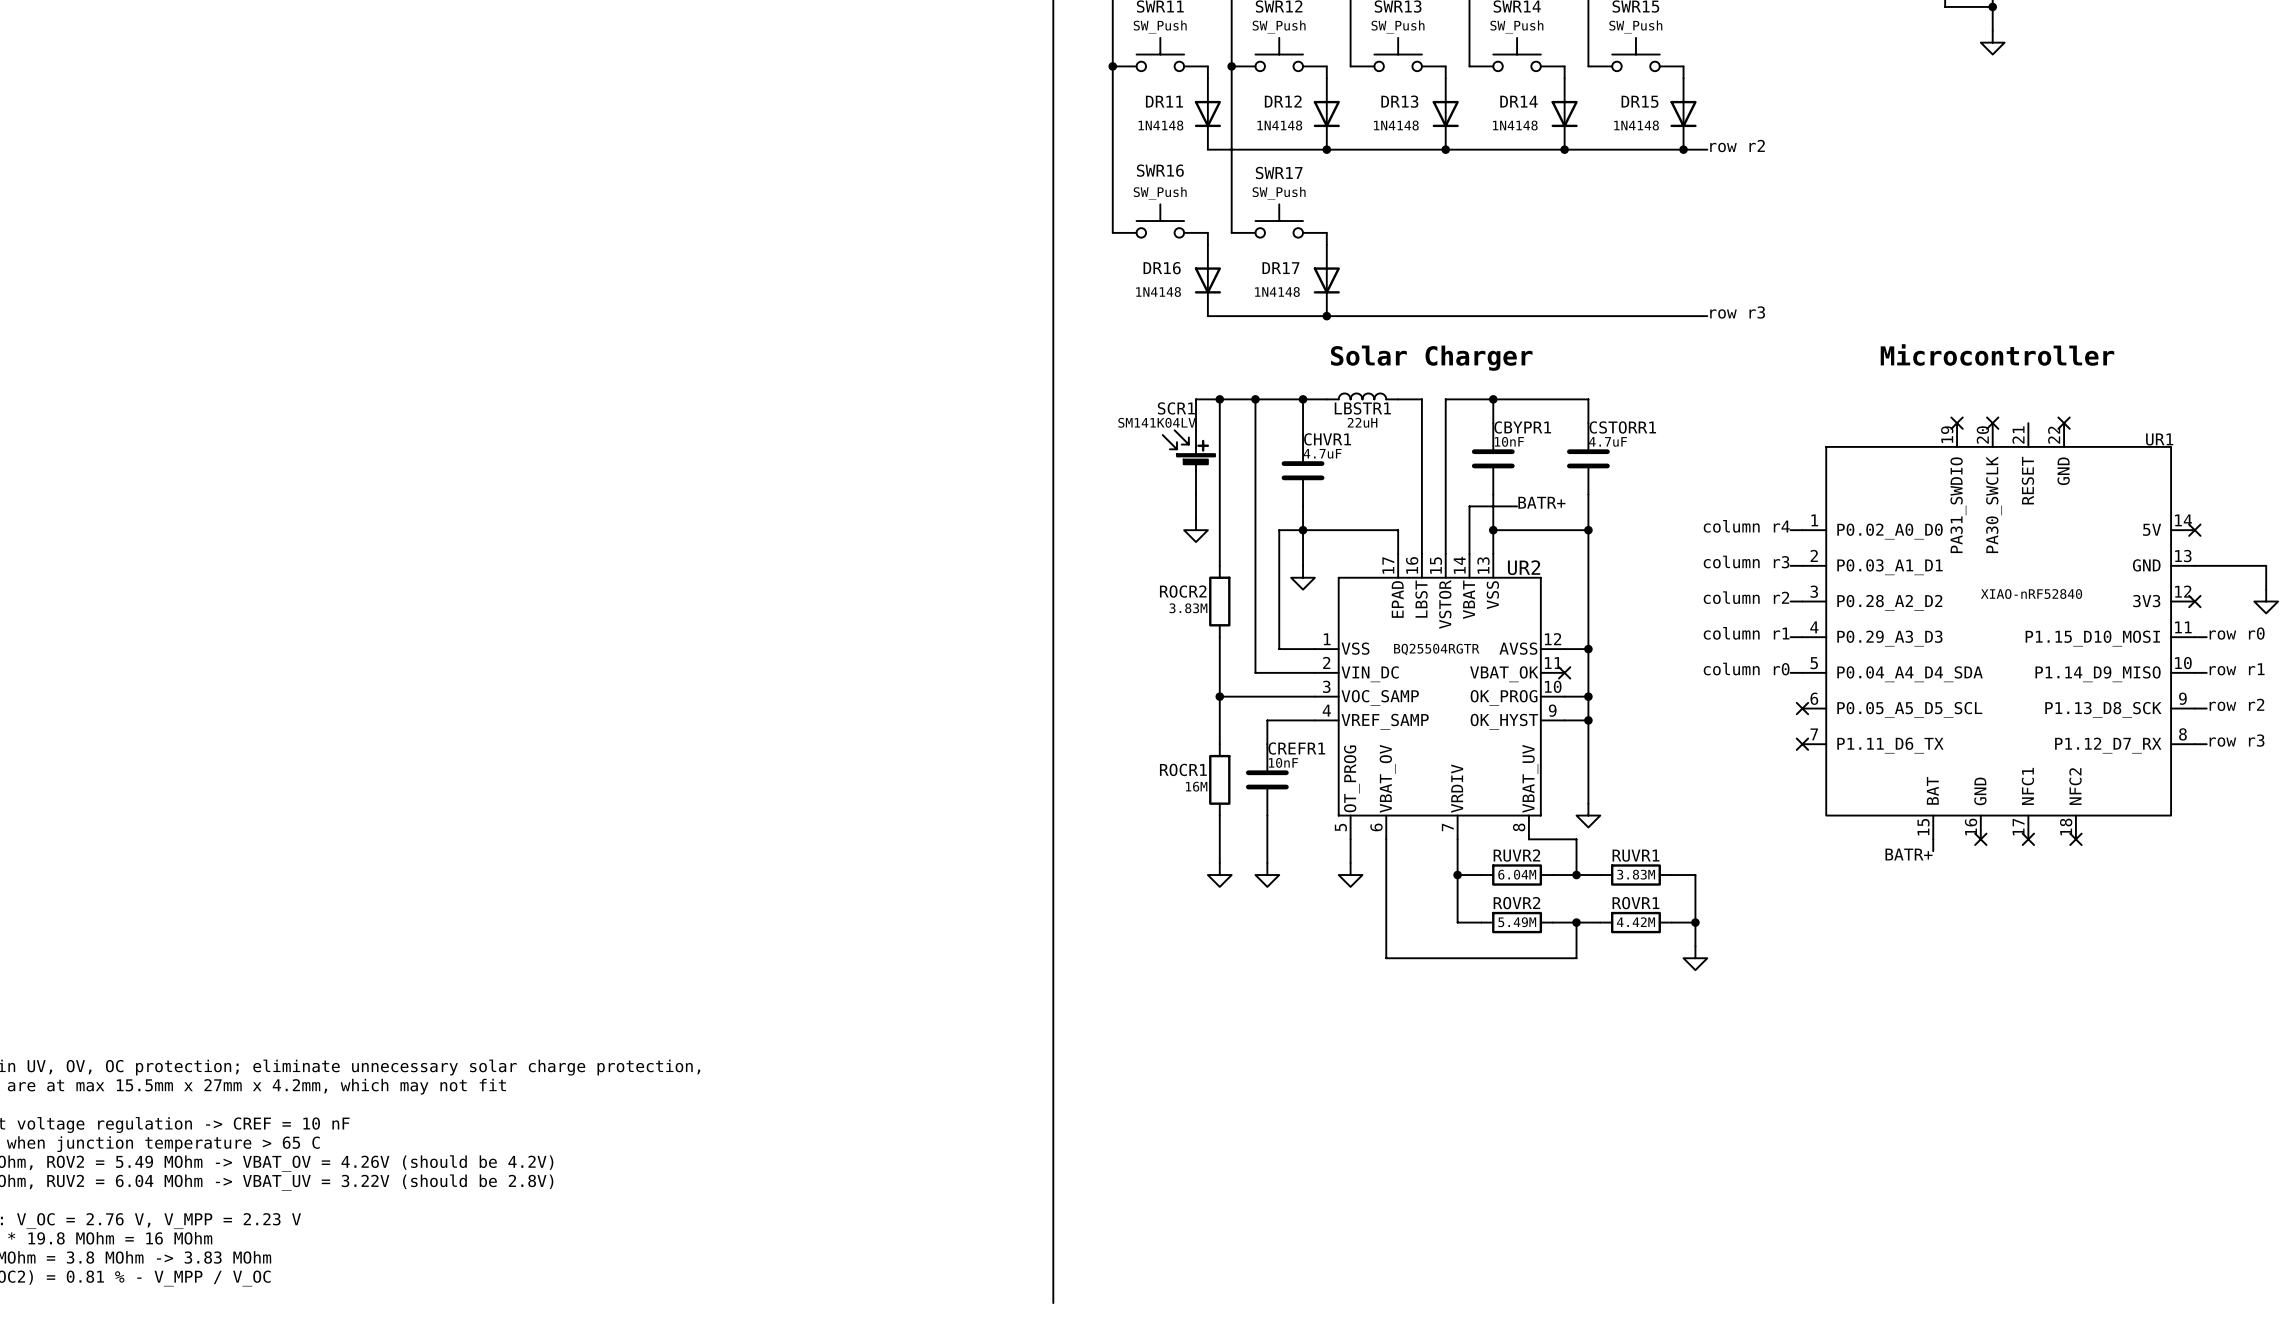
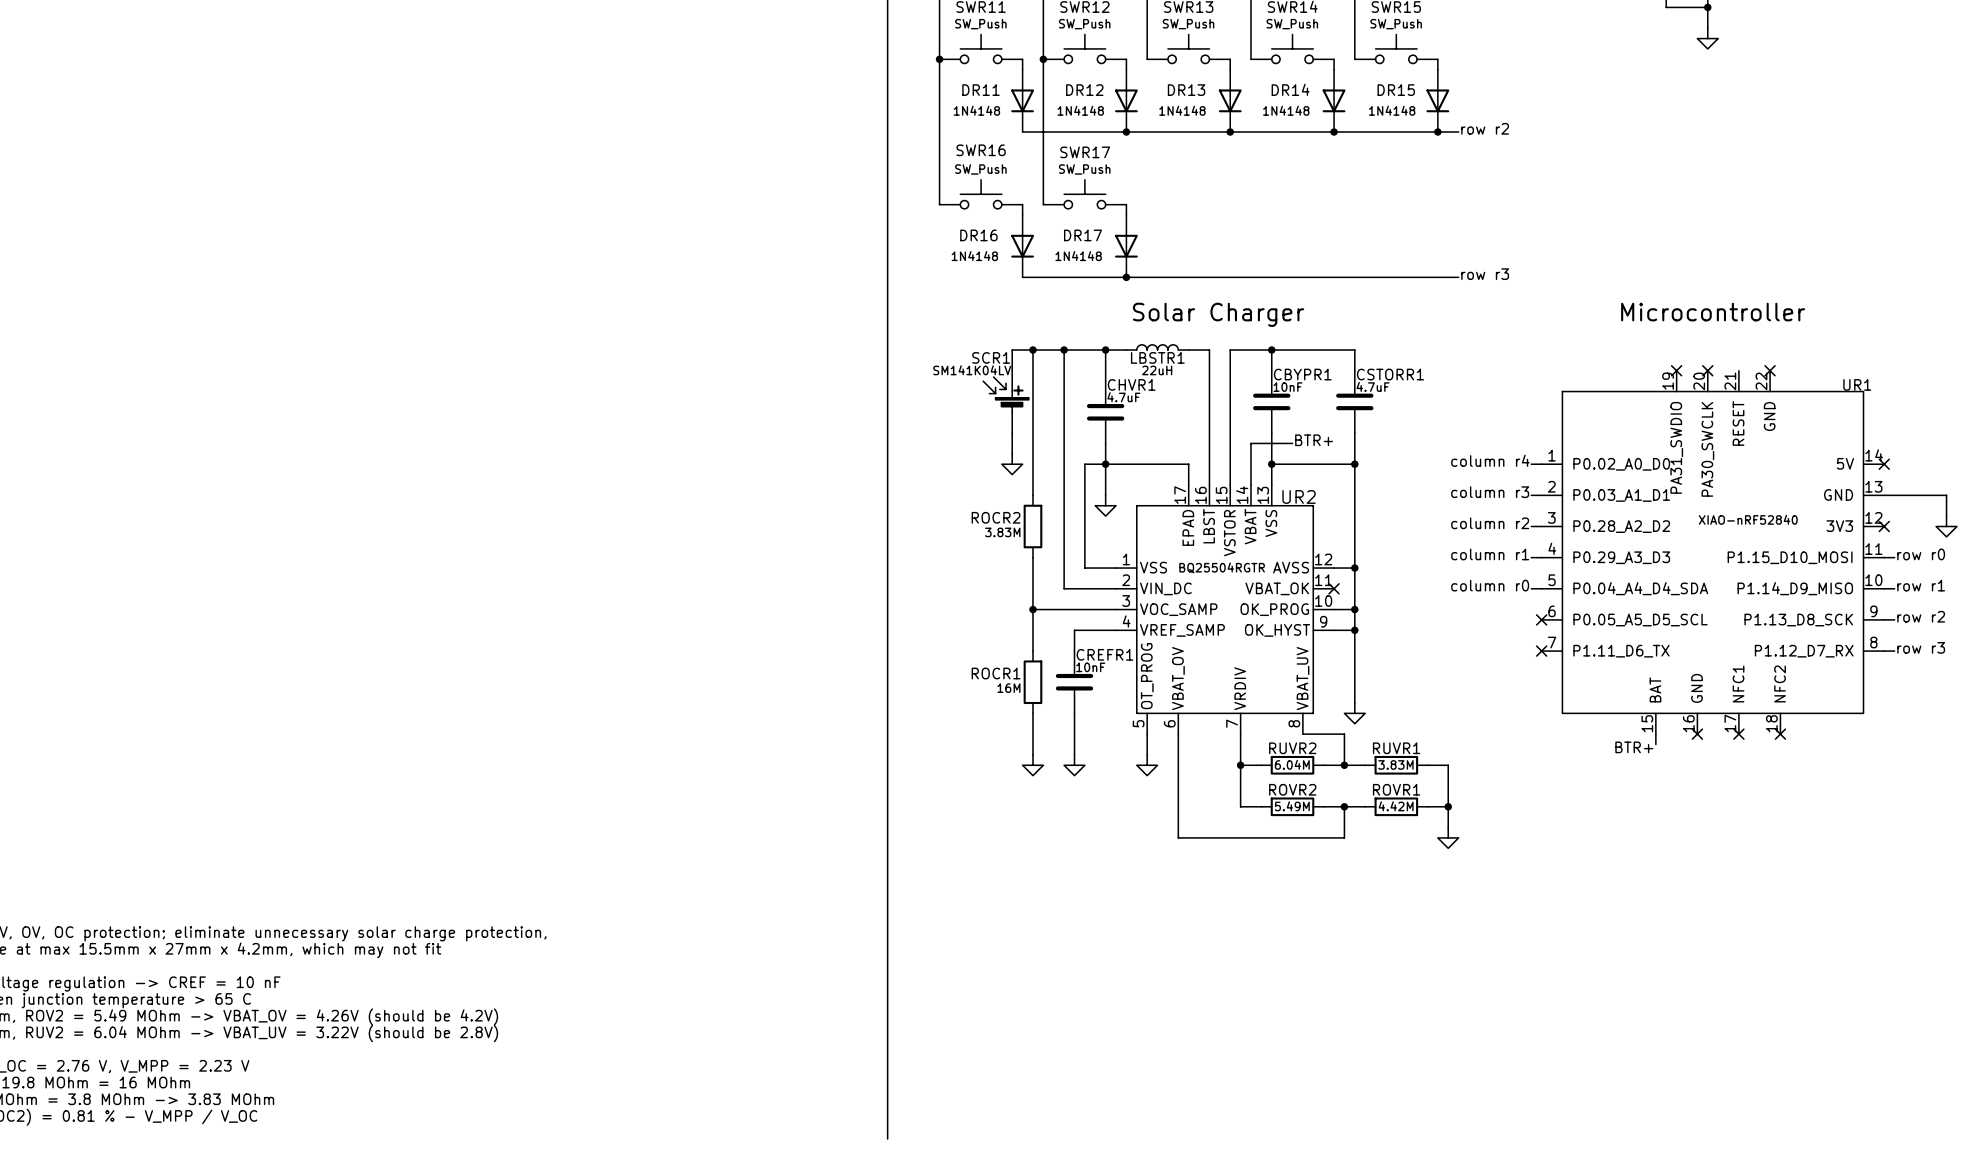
label: BATR+ (1541, 502) -> BTR+ (1314, 440)
label: BATR+ (1909, 854) -> BTR+ (1634, 747)

